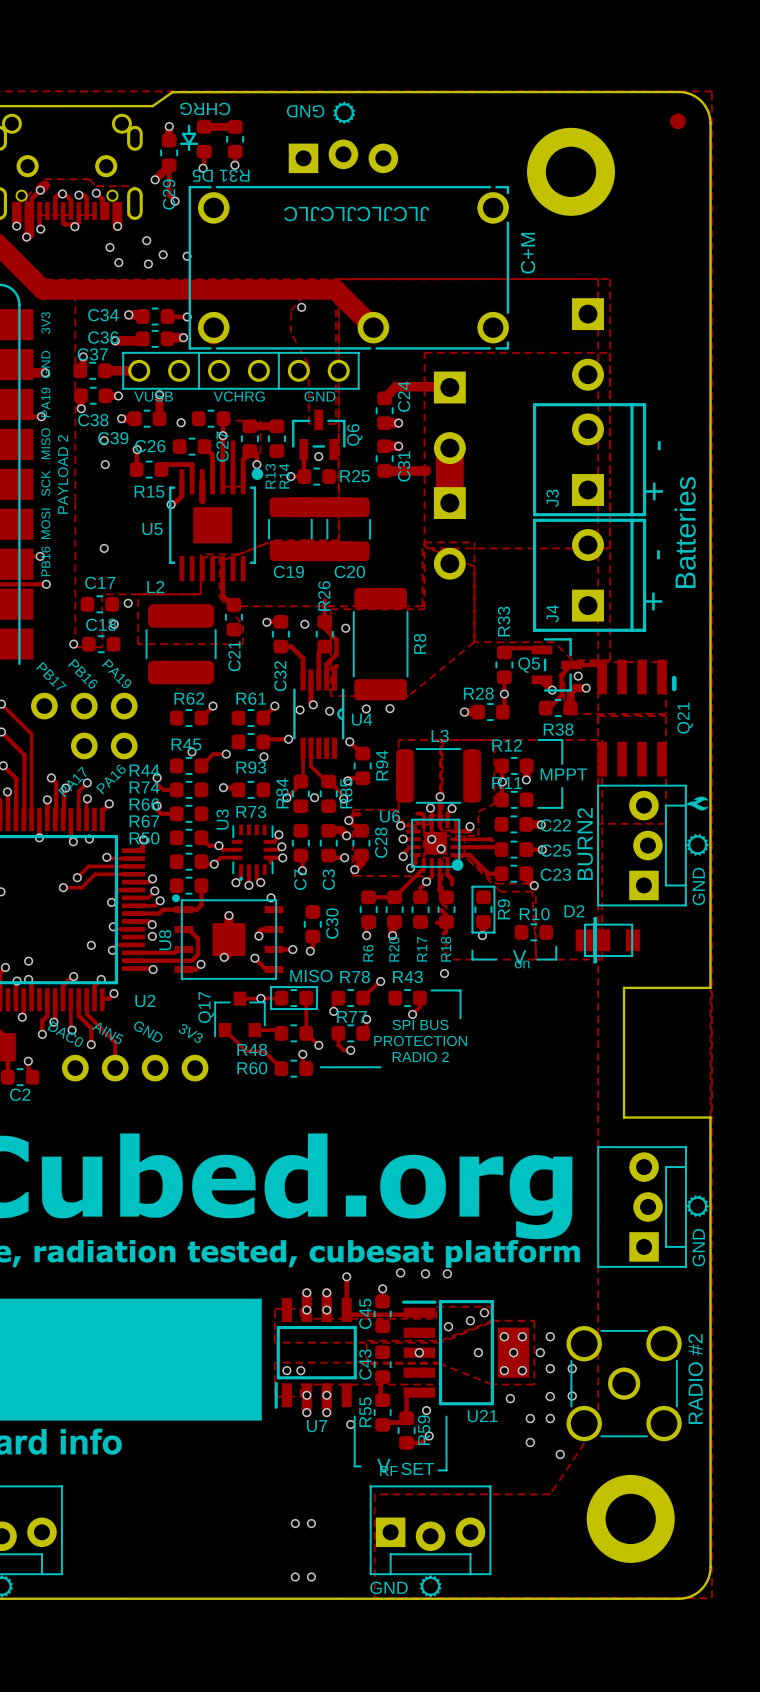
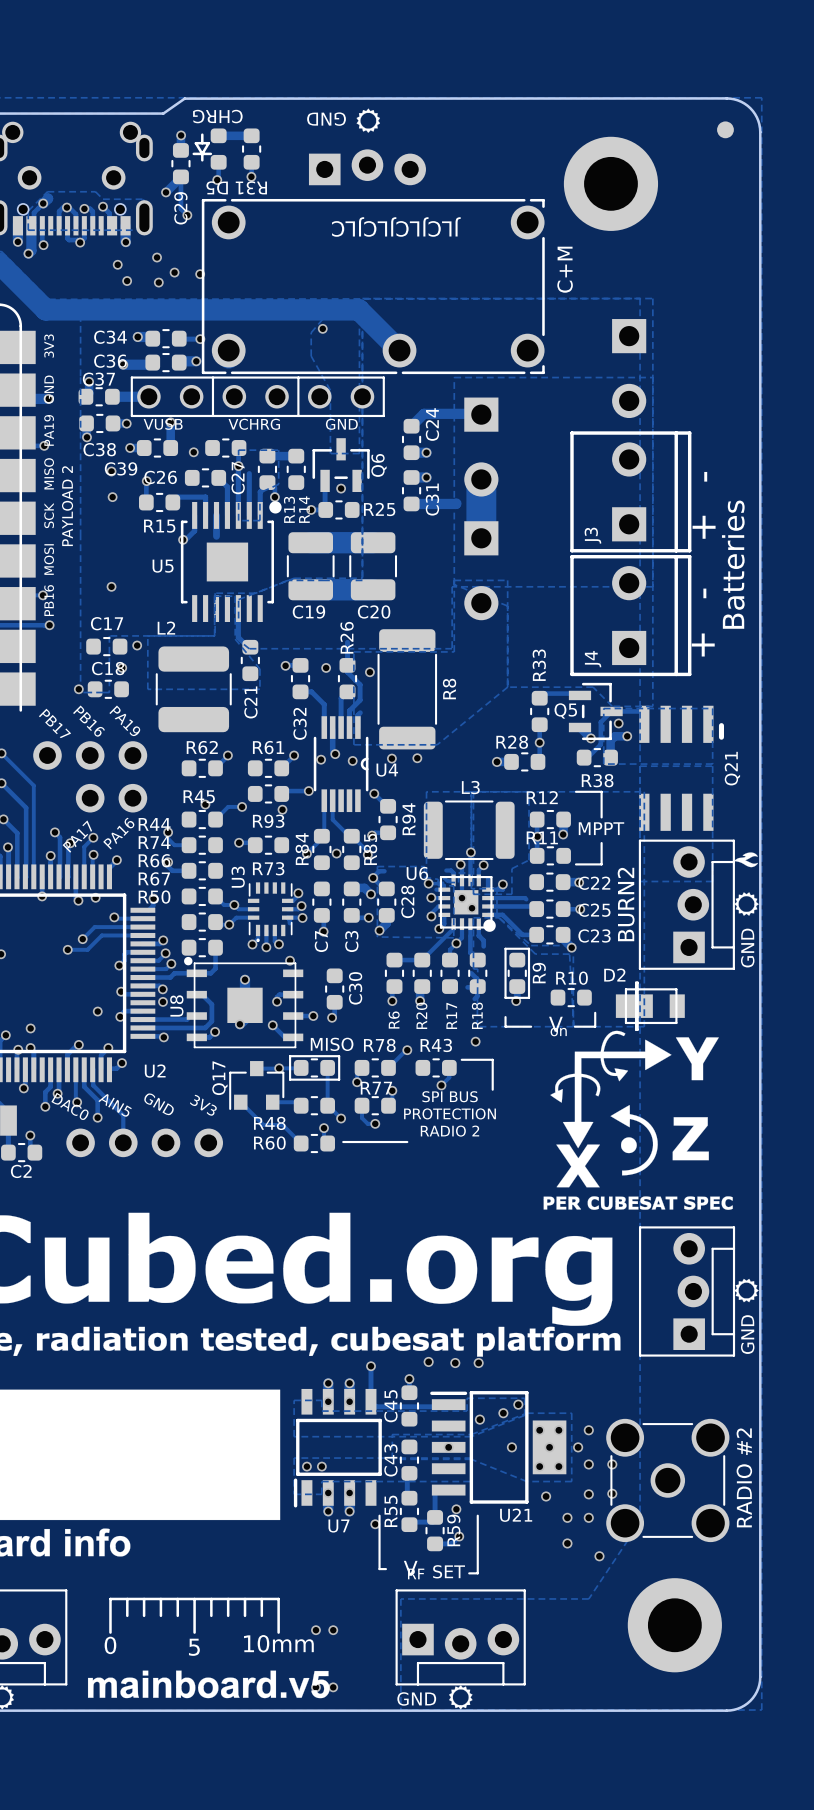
board edge: (710, 123) (710, 987) (624, 987) (624, 1117) (710, 1117) (710, 1567) -> (760, 132) (760, 1677)
drawing: none -> [543, 1030, 733, 1210]
drawing: none -> [87, 1597, 330, 1699]

